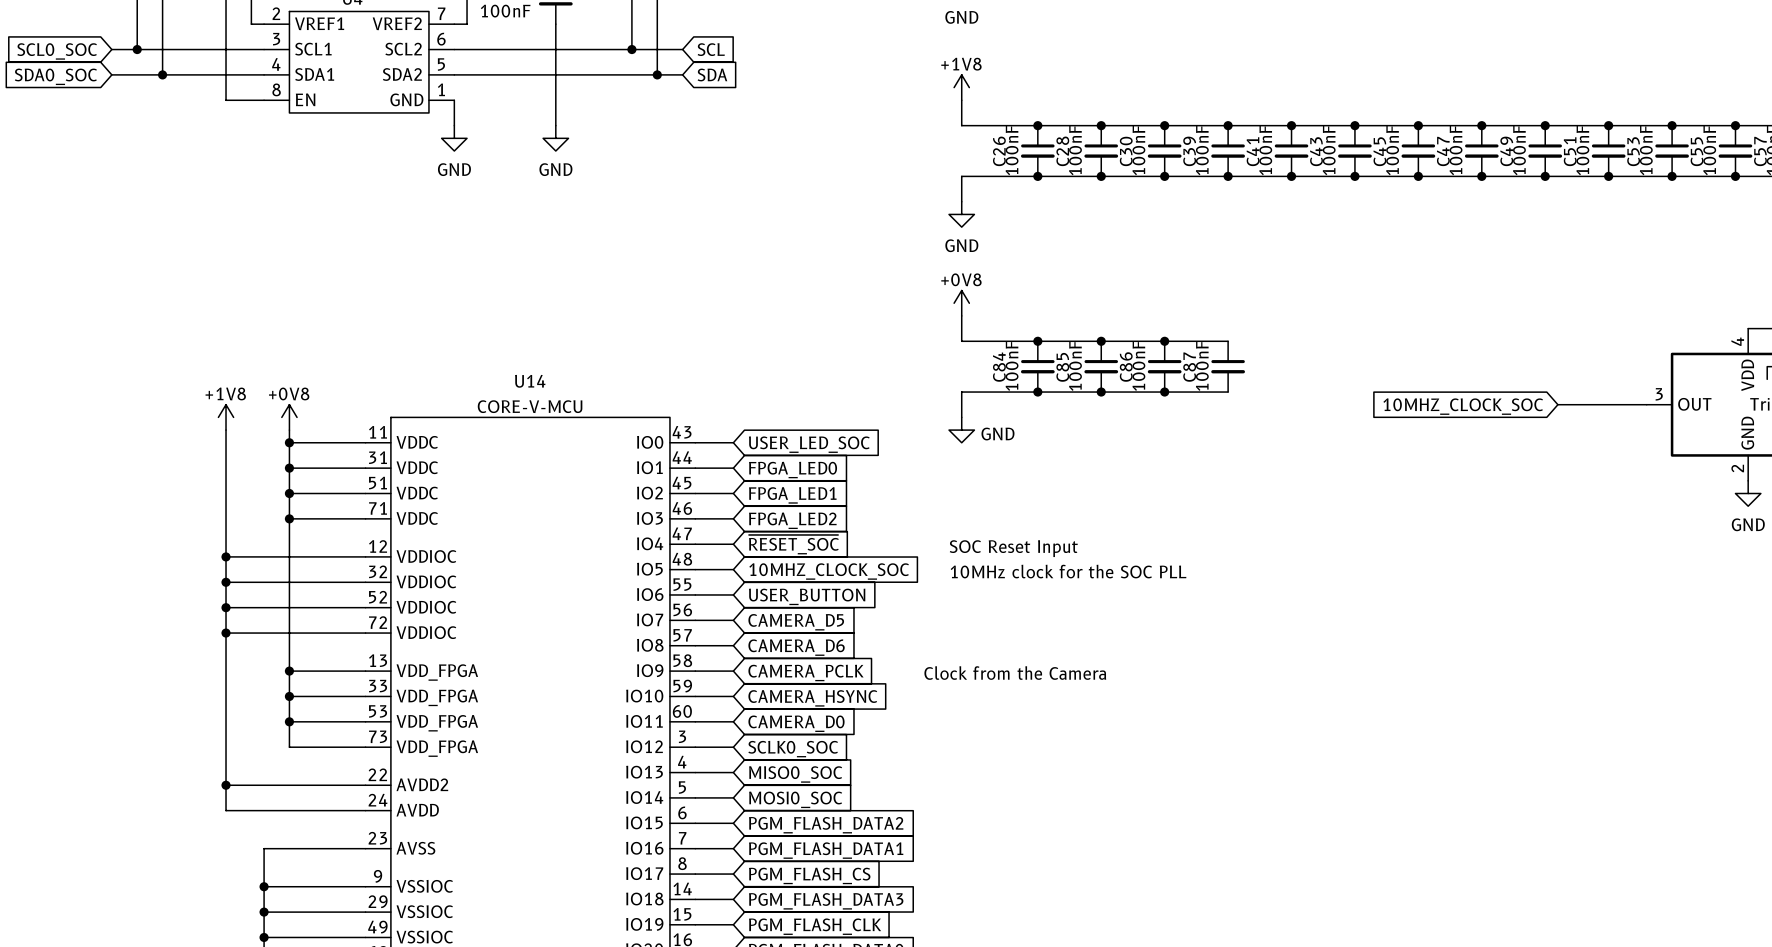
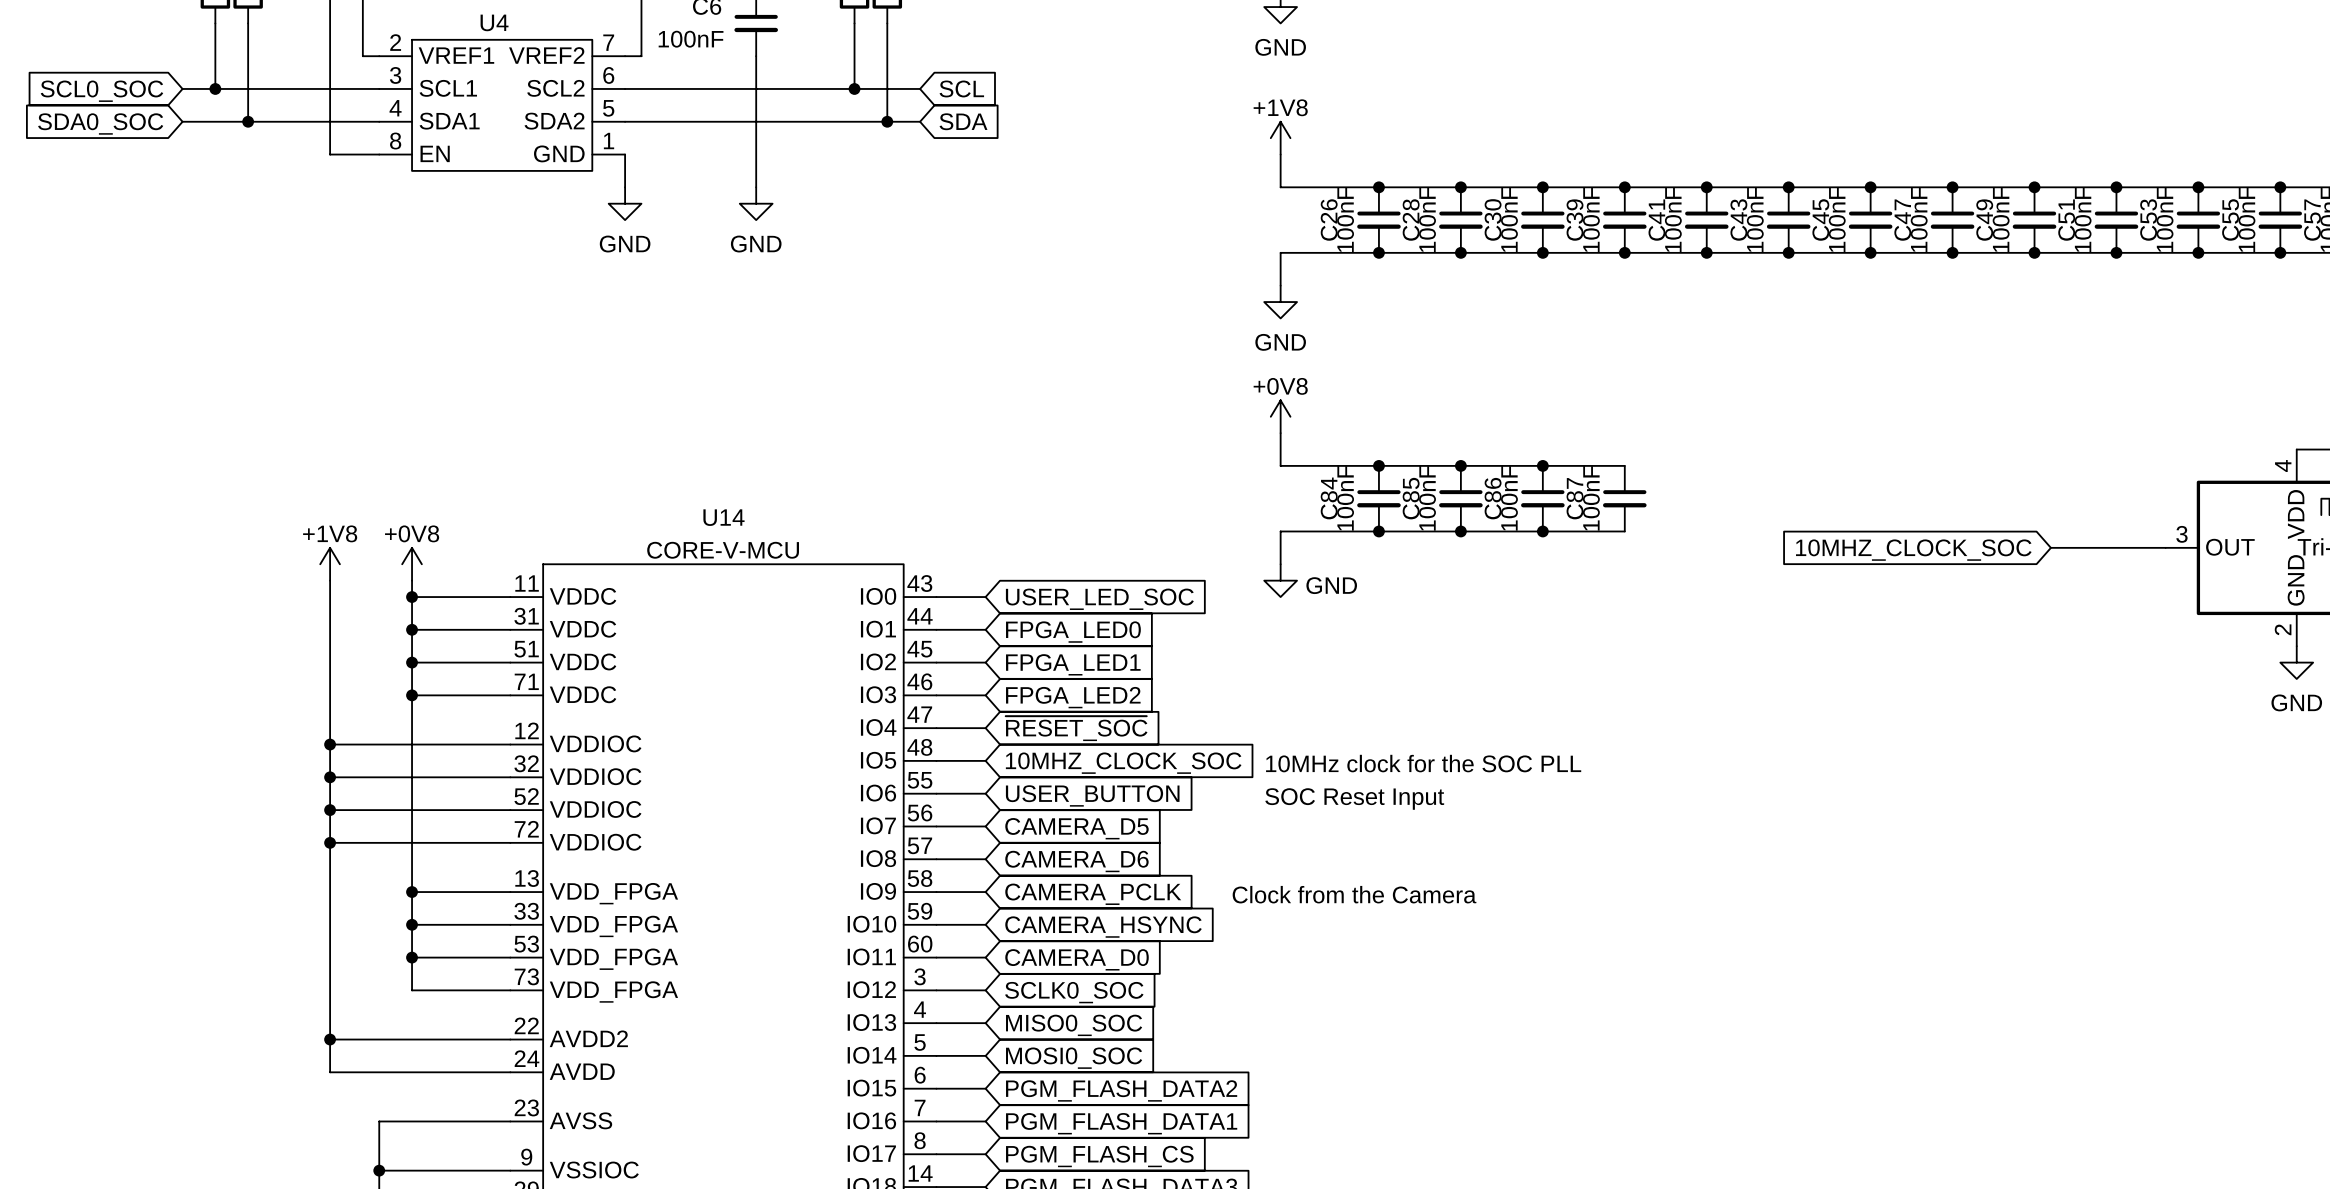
text position: SOC Reset Input (1013, 548) -> SOC Reset Input (1354, 799)

